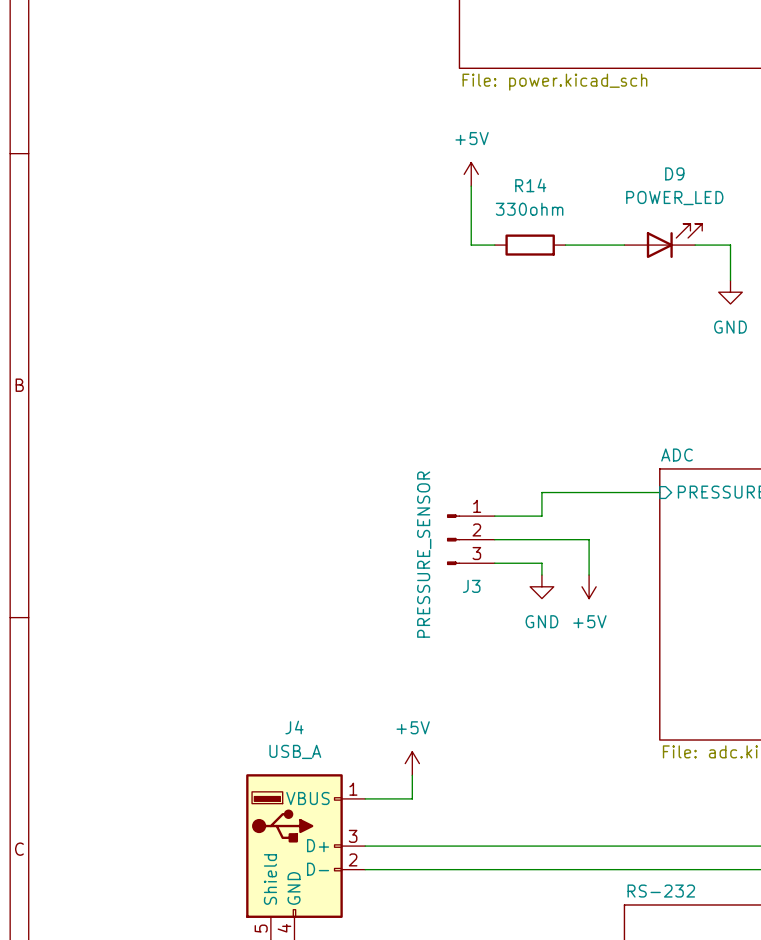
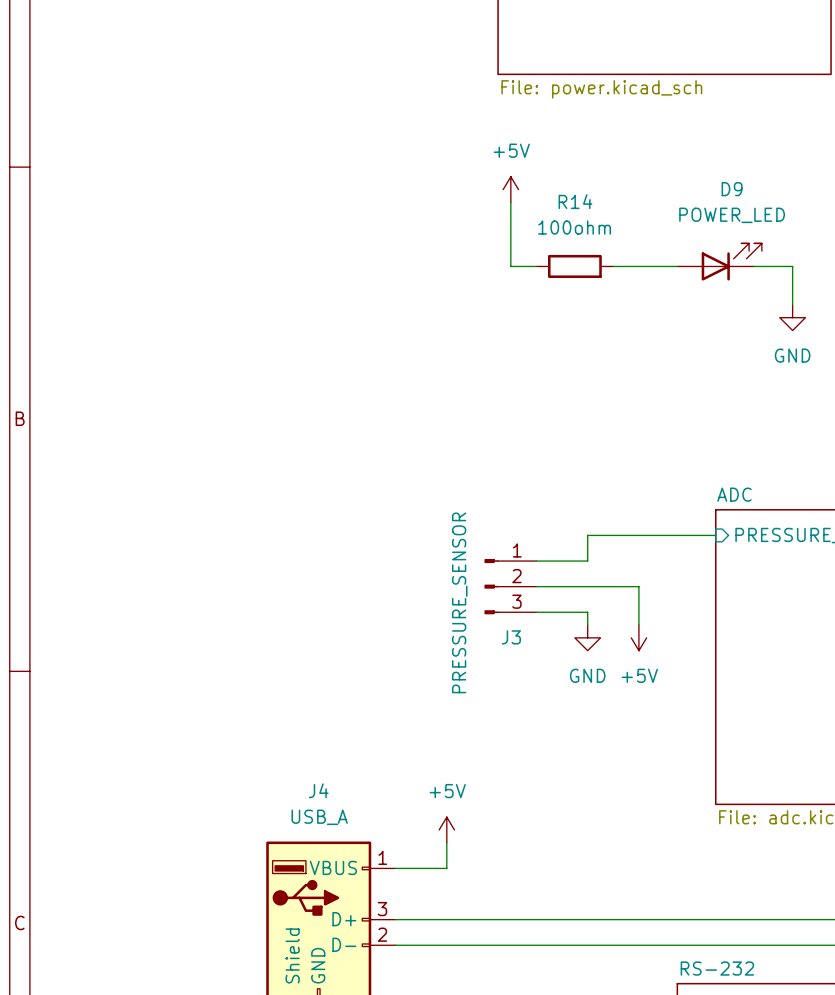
R14 value: 330ohm (529, 209) -> 100ohm (574, 227)

